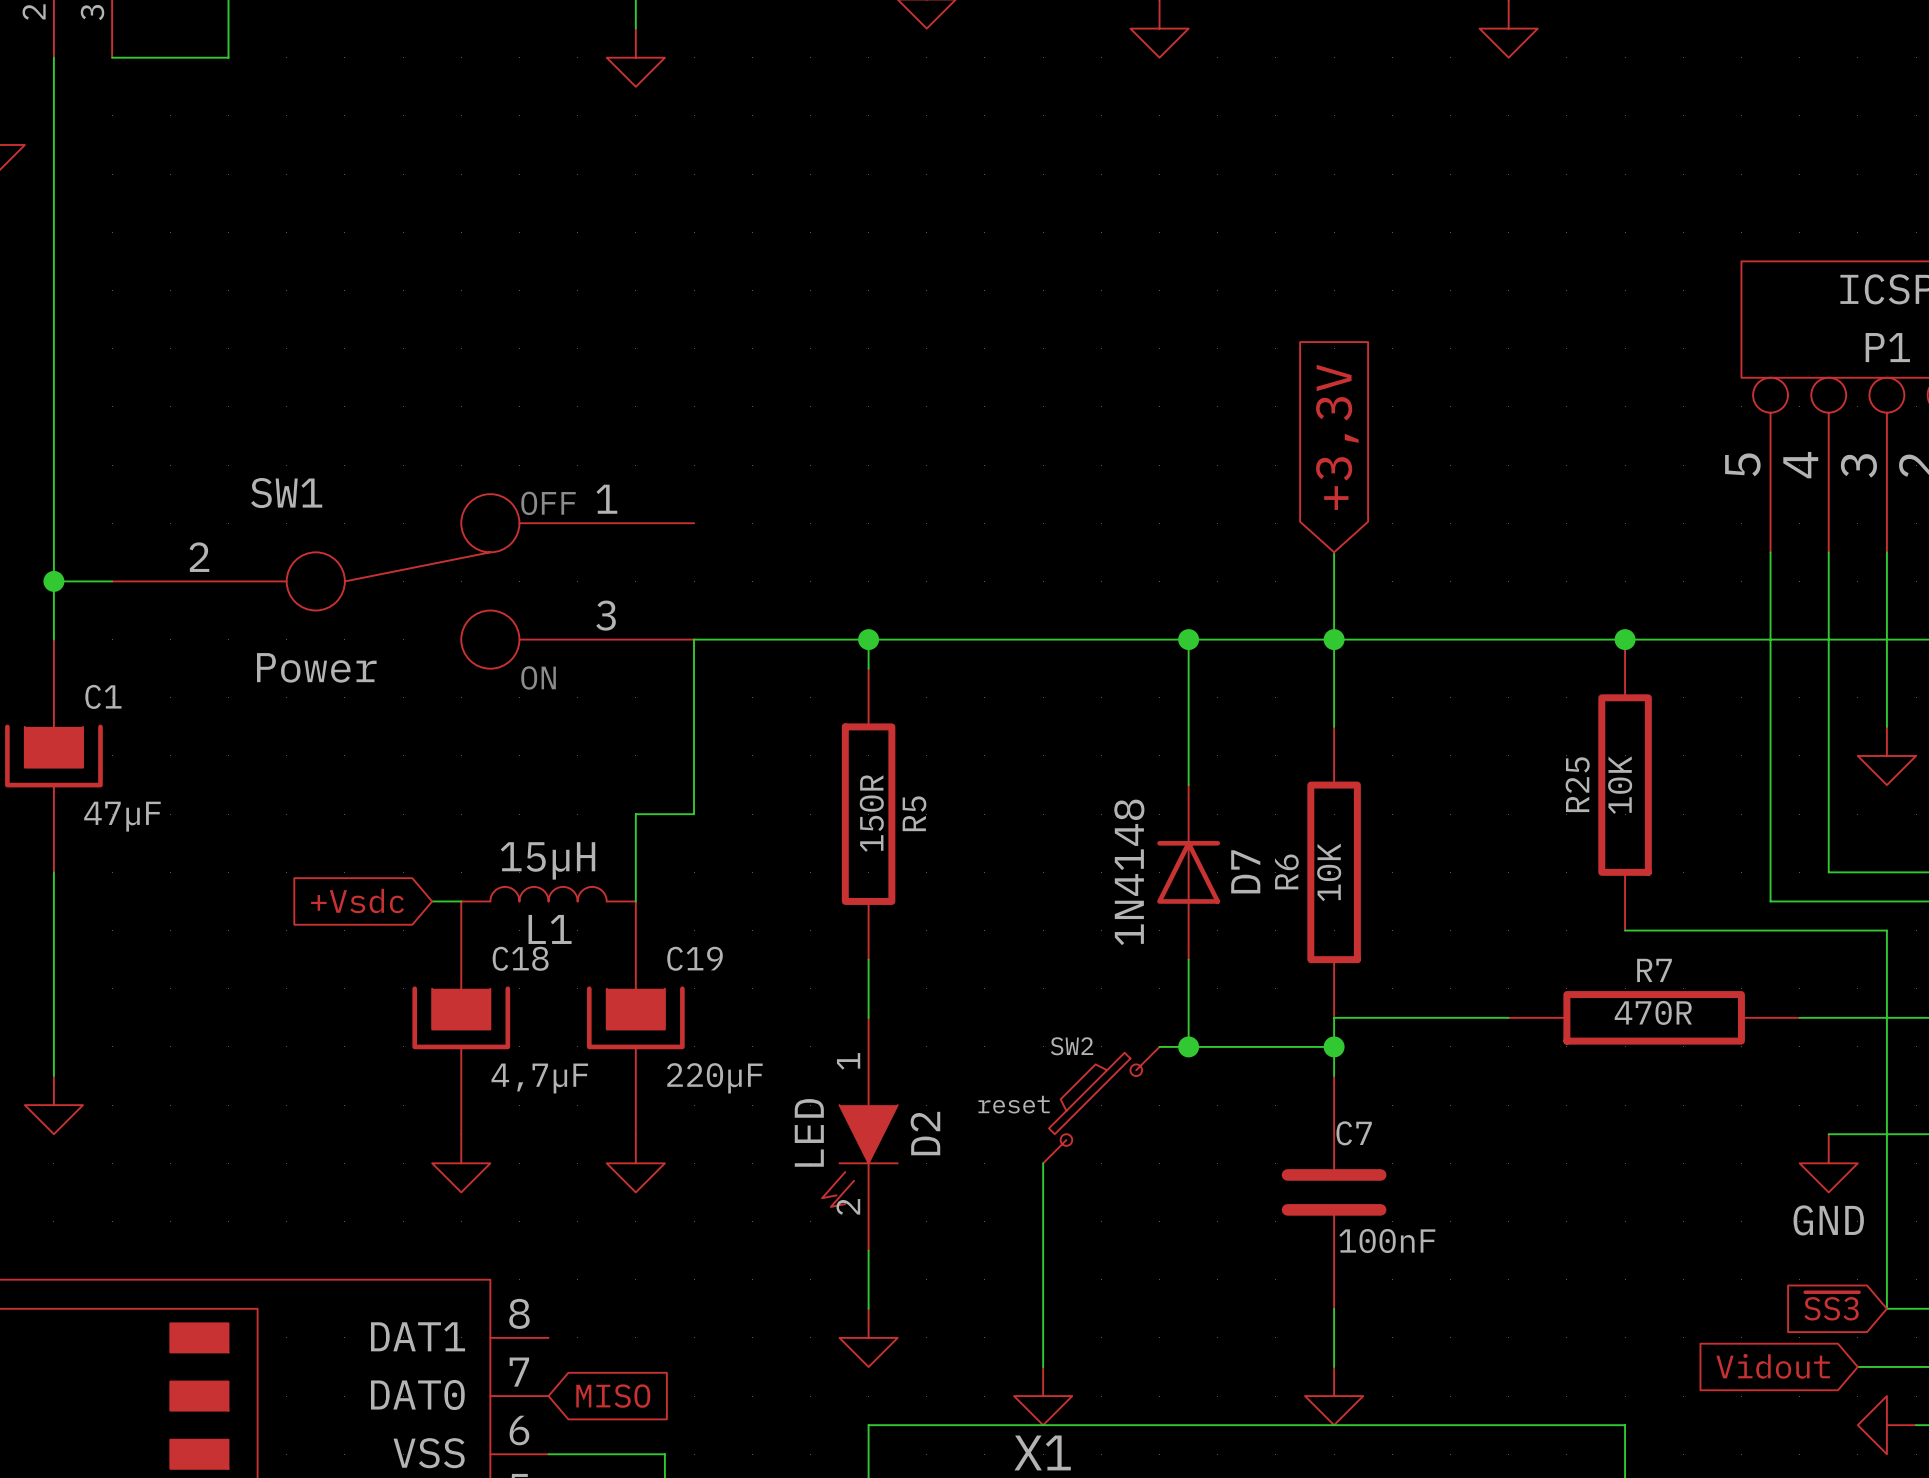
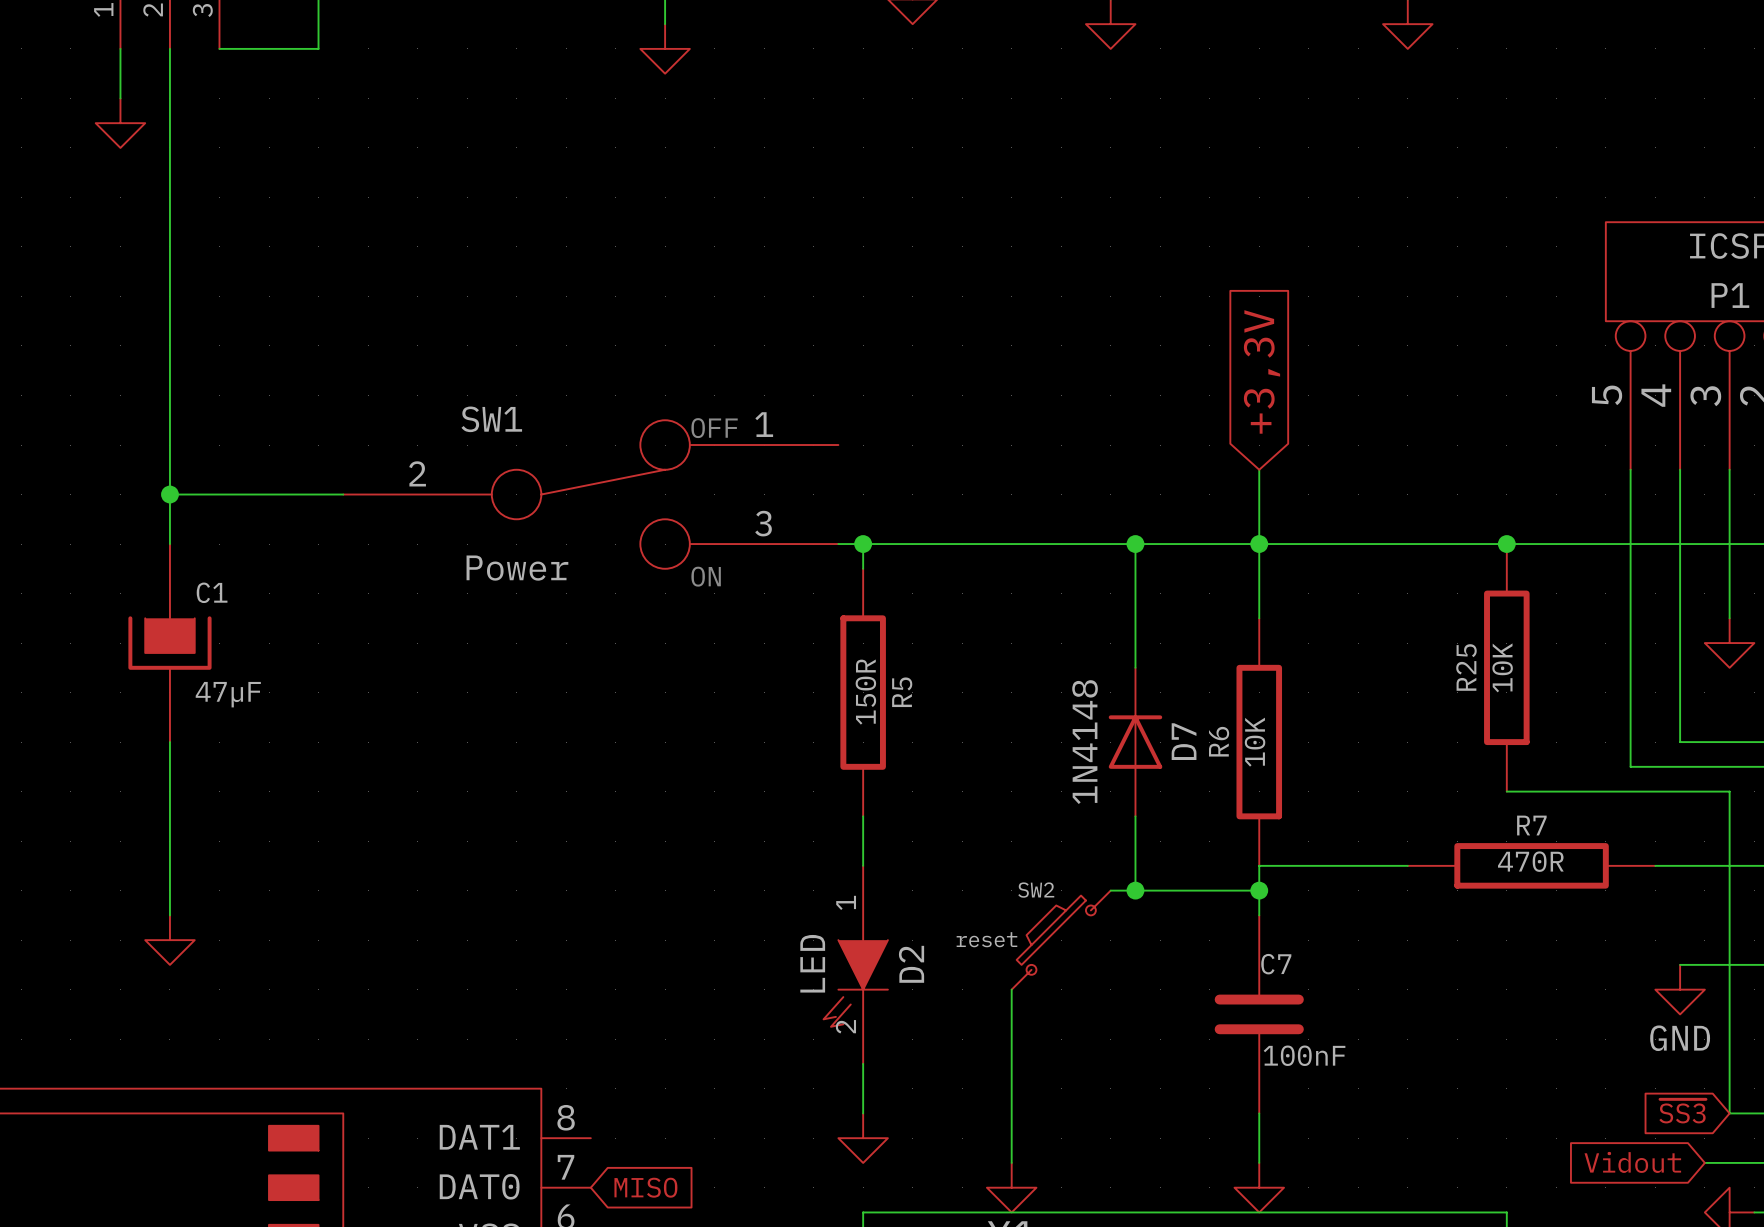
text position: OFF (548, 503) -> OFF (714, 428)
SW1 position: (403, 581) -> (590, 494)
wire: (839, 639) (694, 639) (694, 814) (635, 814) (635, 901) -> none
text position: ON (538, 677) -> ON (706, 576)
L1: 15µH (548, 894) -> none
global label: +Vsdc (357, 900) -> none
wire: (432, 901) (461, 901) -> none
C18: 4,7µF (461, 1017) -> none
C19: 220µF (635, 1017) -> none
power symbol: (461, 1163) -> none
power symbol: (635, 1163) -> none

